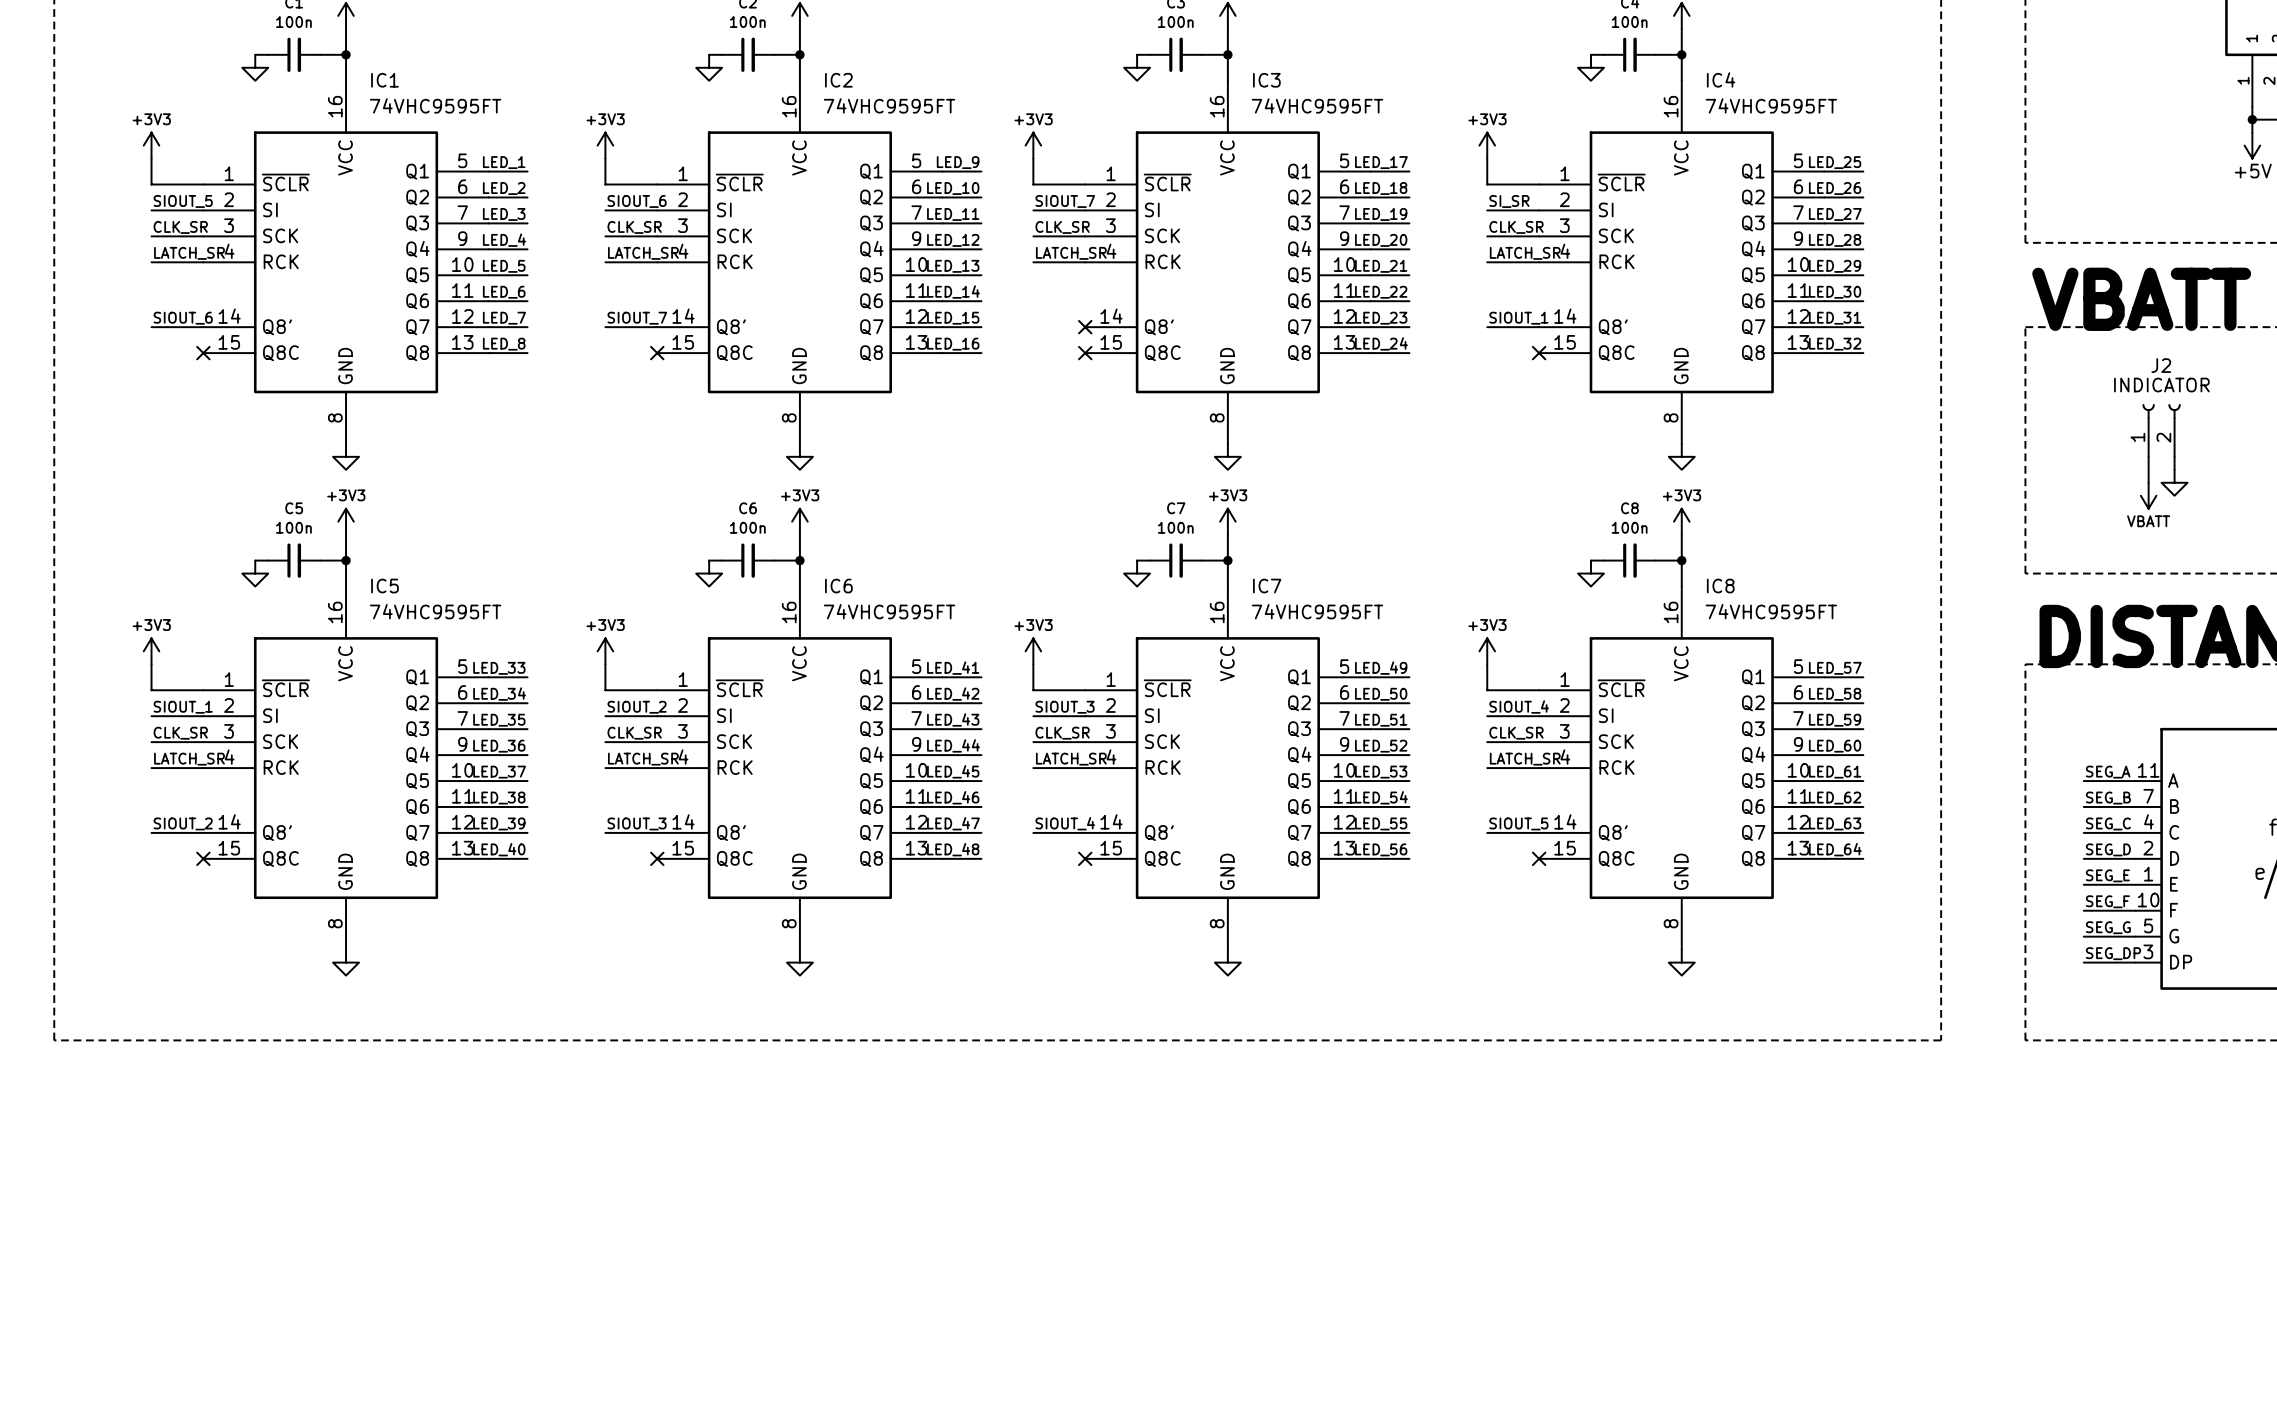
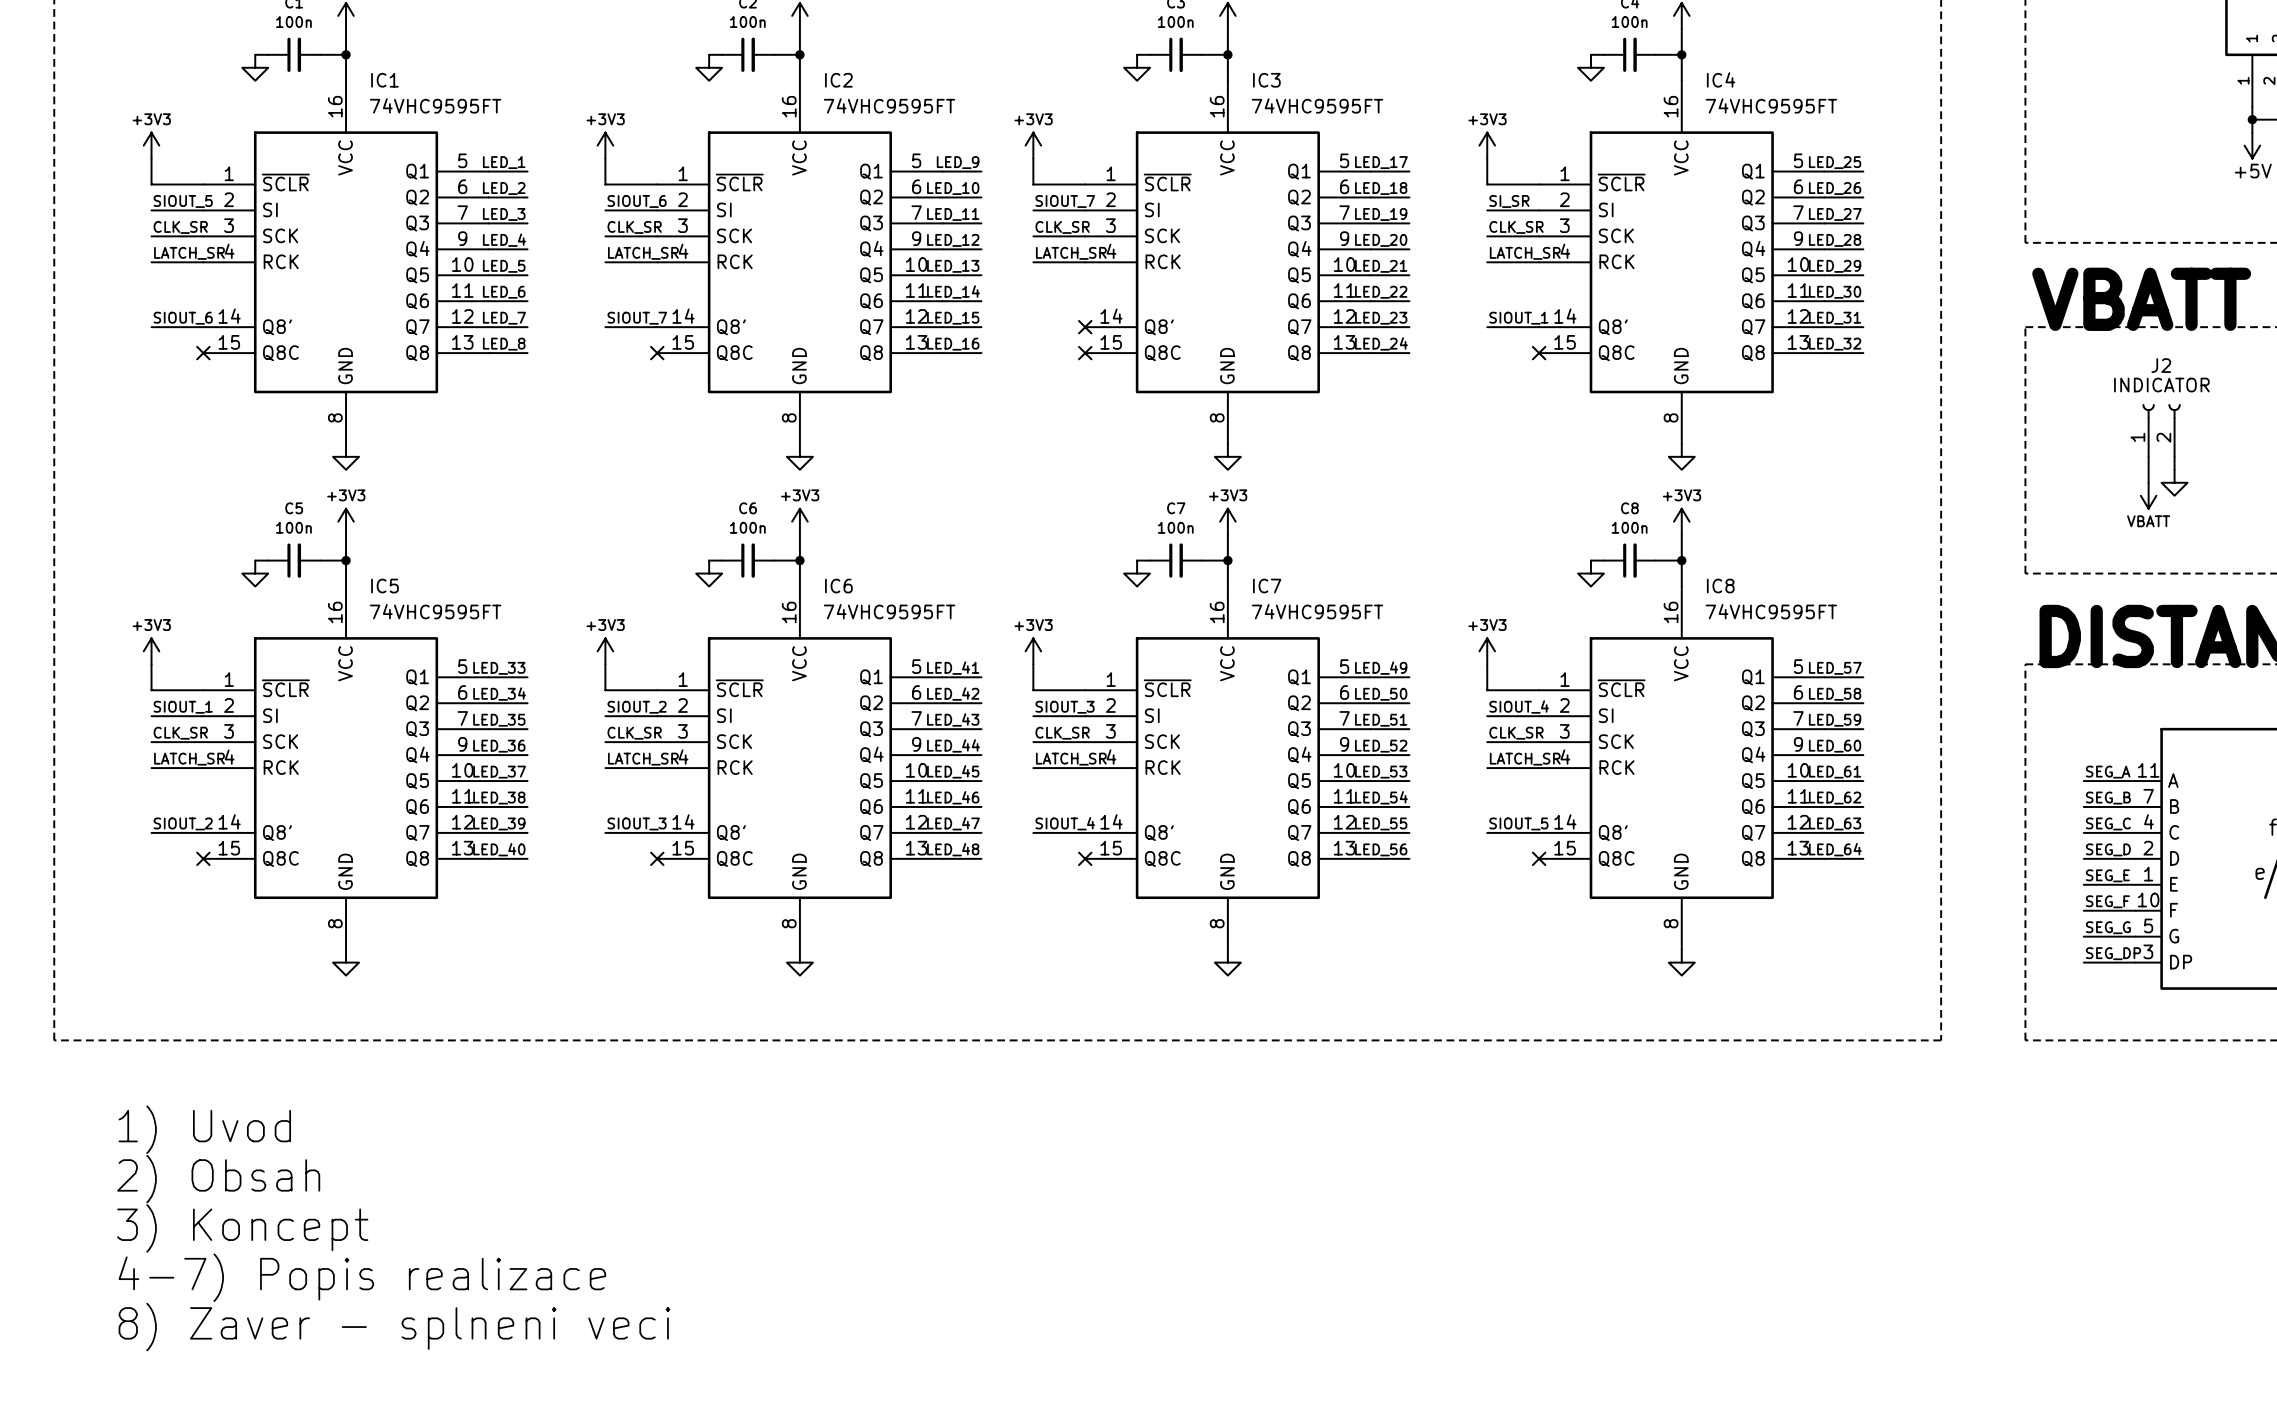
text: none -> 1) Uvod (204, 1129)
text: none -> 2) Obsah (218, 1179)
text: none -> 3) Koncept (242, 1228)
text: none -> 4-7) Popis realizace (362, 1277)
text: none -> 8) Zaver - splneni veci (394, 1327)

